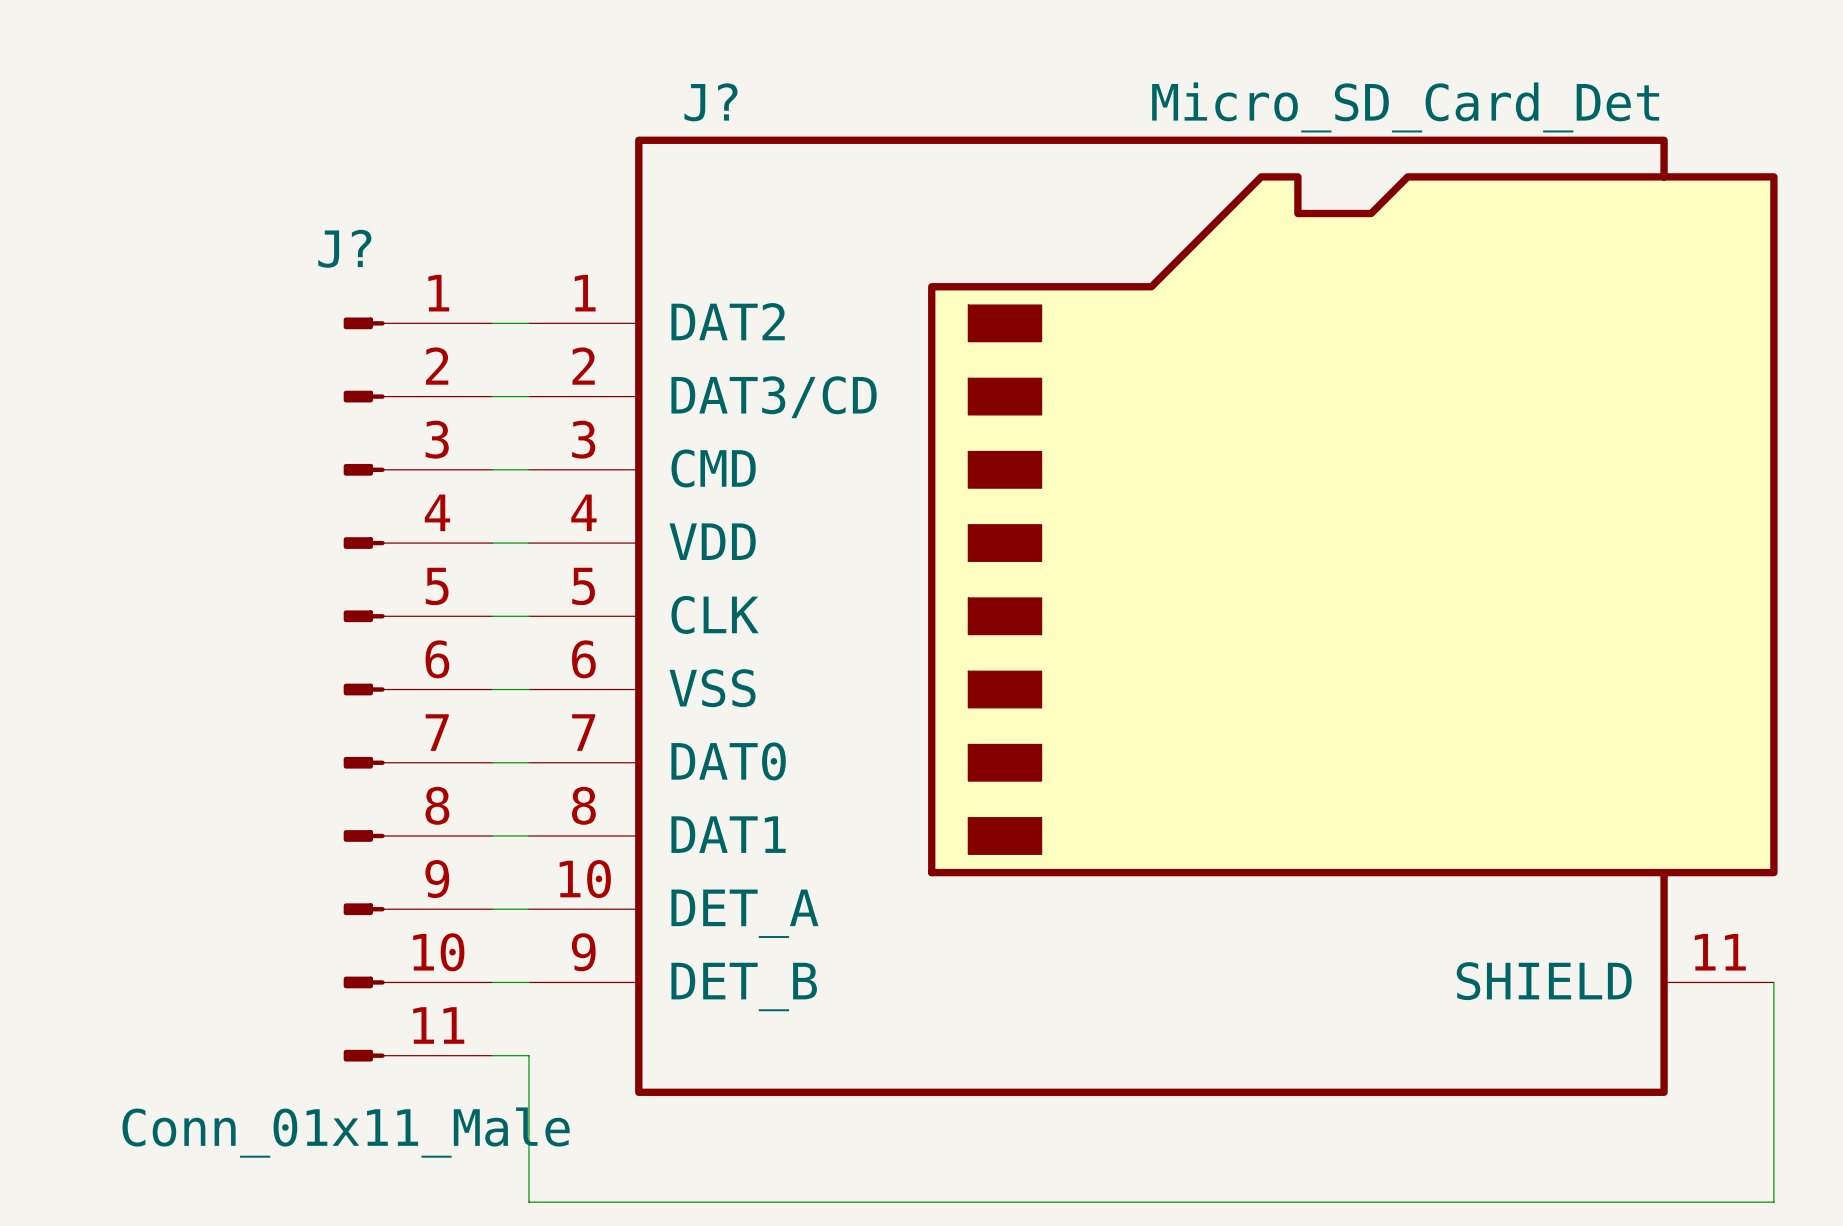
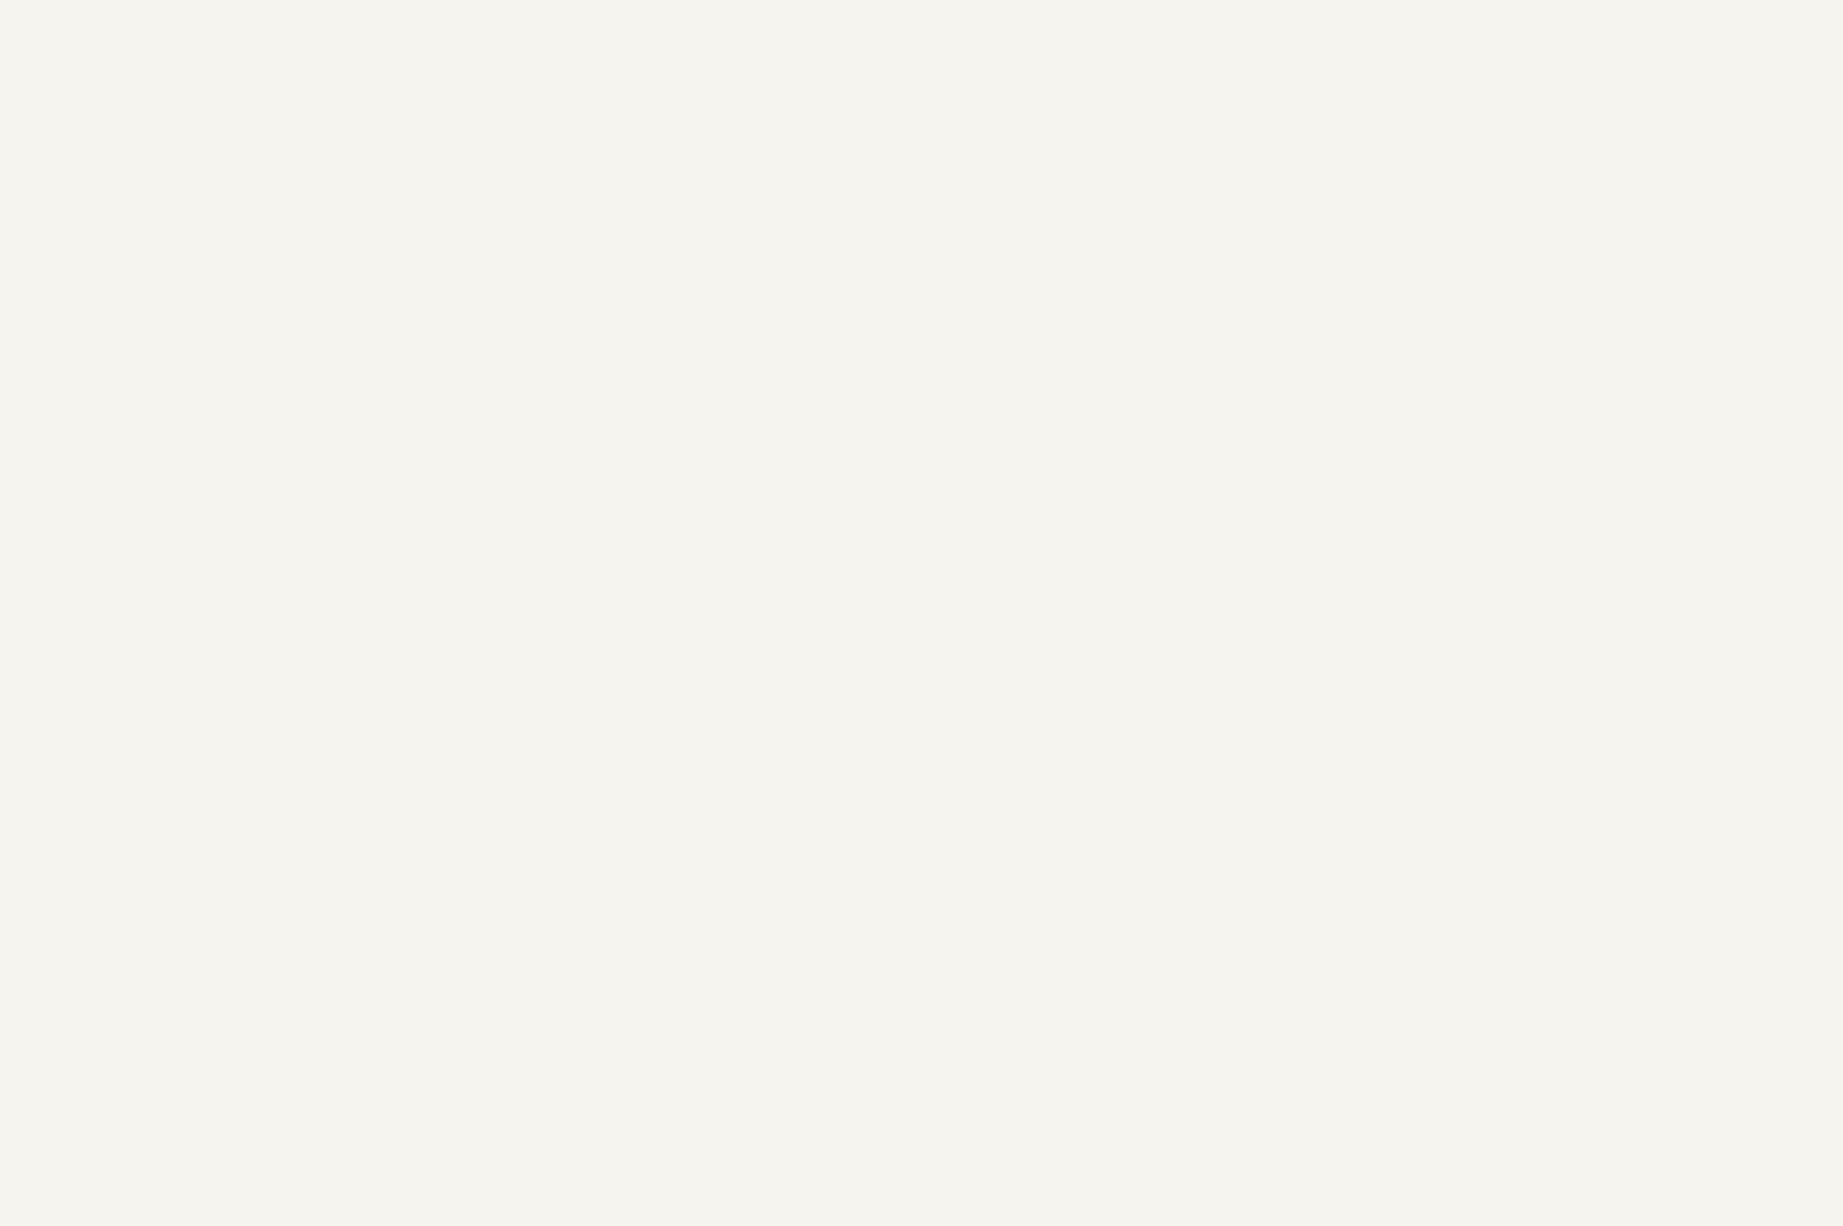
wire: (492, 323) (528, 323) -> none
wire: (492, 396) (528, 396) -> none
wire: (492, 469) (528, 469) -> none
wire: (492, 543) (528, 543) -> none
wire: (492, 616) (528, 616) -> none
J?: Micro_SD_Card_Det (1153, 616) -> none
J?: Conn_01x11_Male (418, 689) -> none
wire: (492, 689) (528, 689) -> none
wire: (492, 762) (528, 762) -> none
wire: (492, 835) (528, 835) -> none
wire: (492, 909) (528, 909) -> none
wire: (492, 982) (528, 982) -> none
wire: (1773, 982) (1773, 1202) (528, 1202) (528, 1055) (492, 1055) -> none

